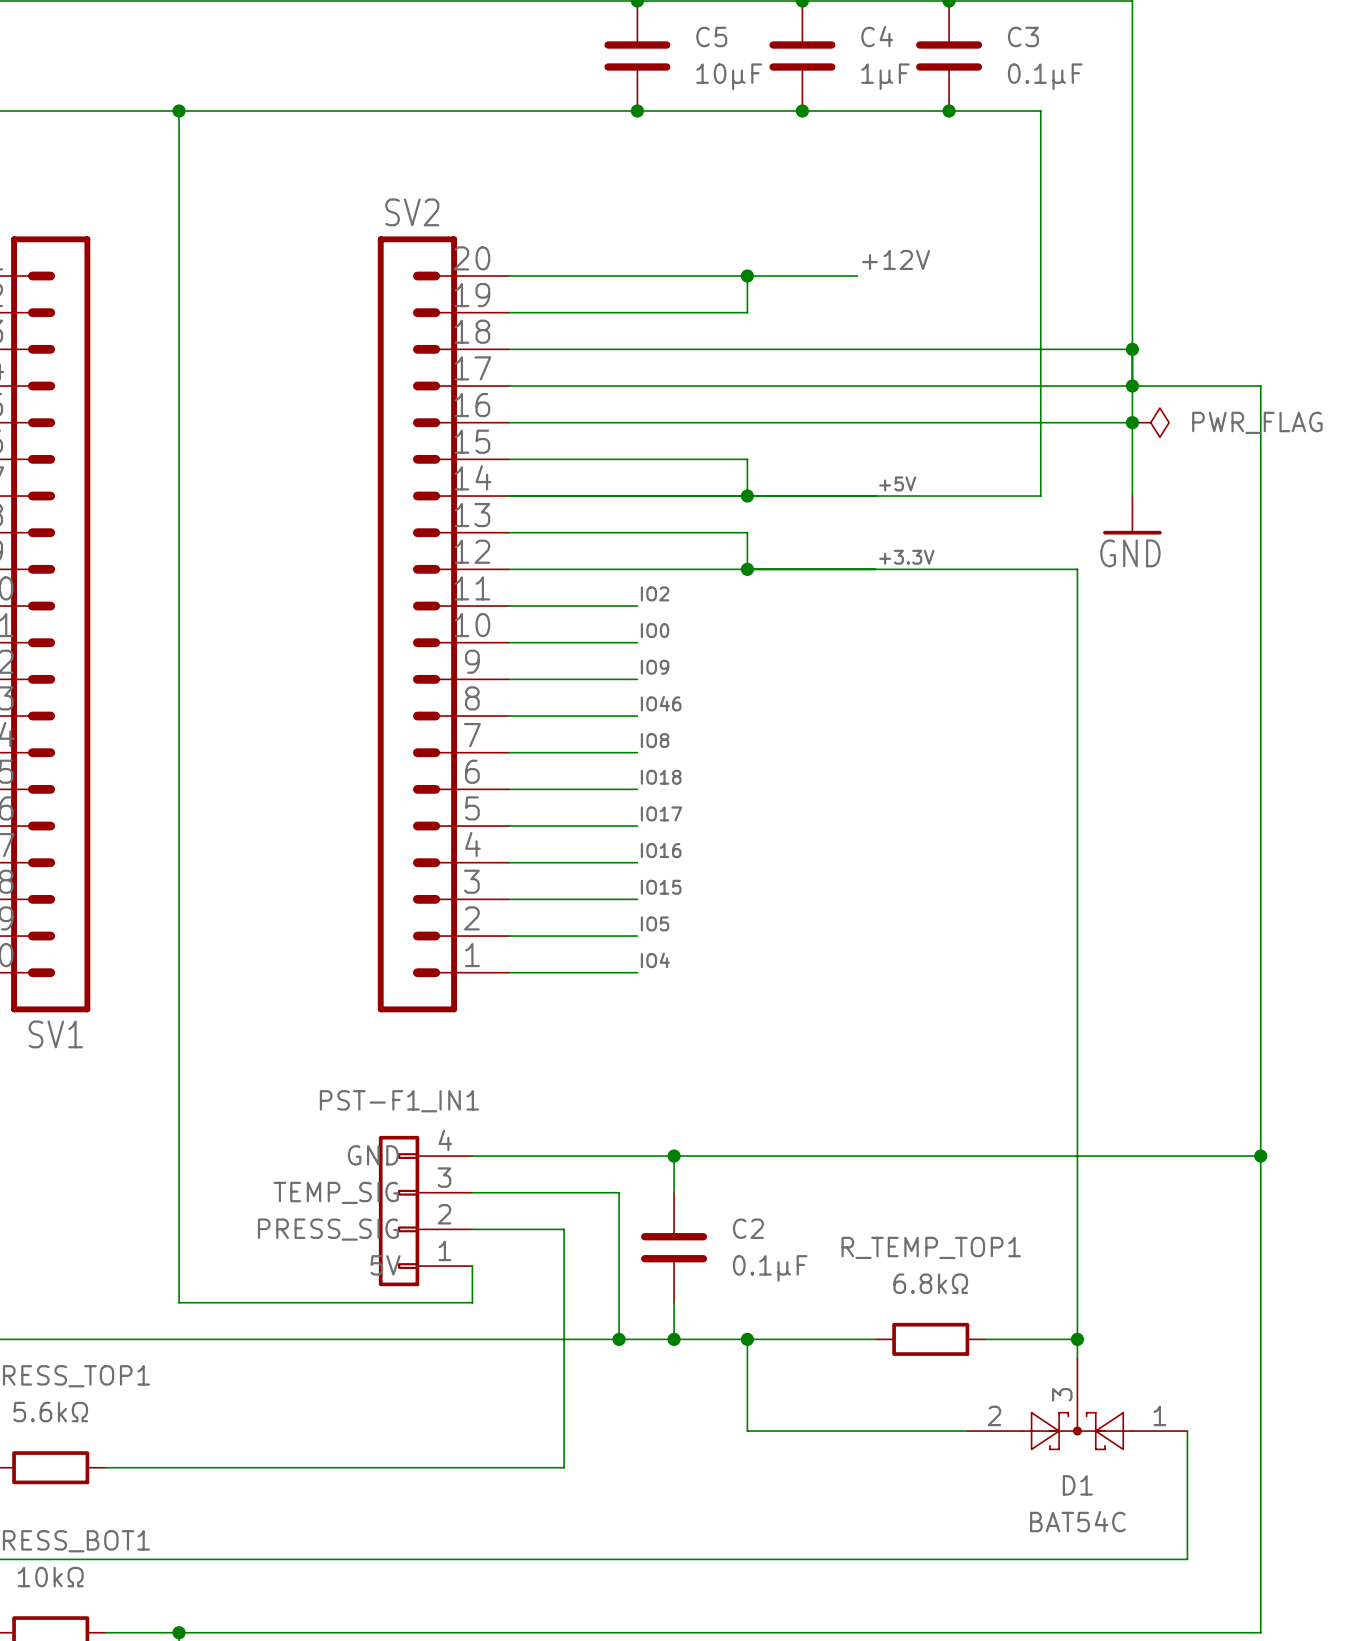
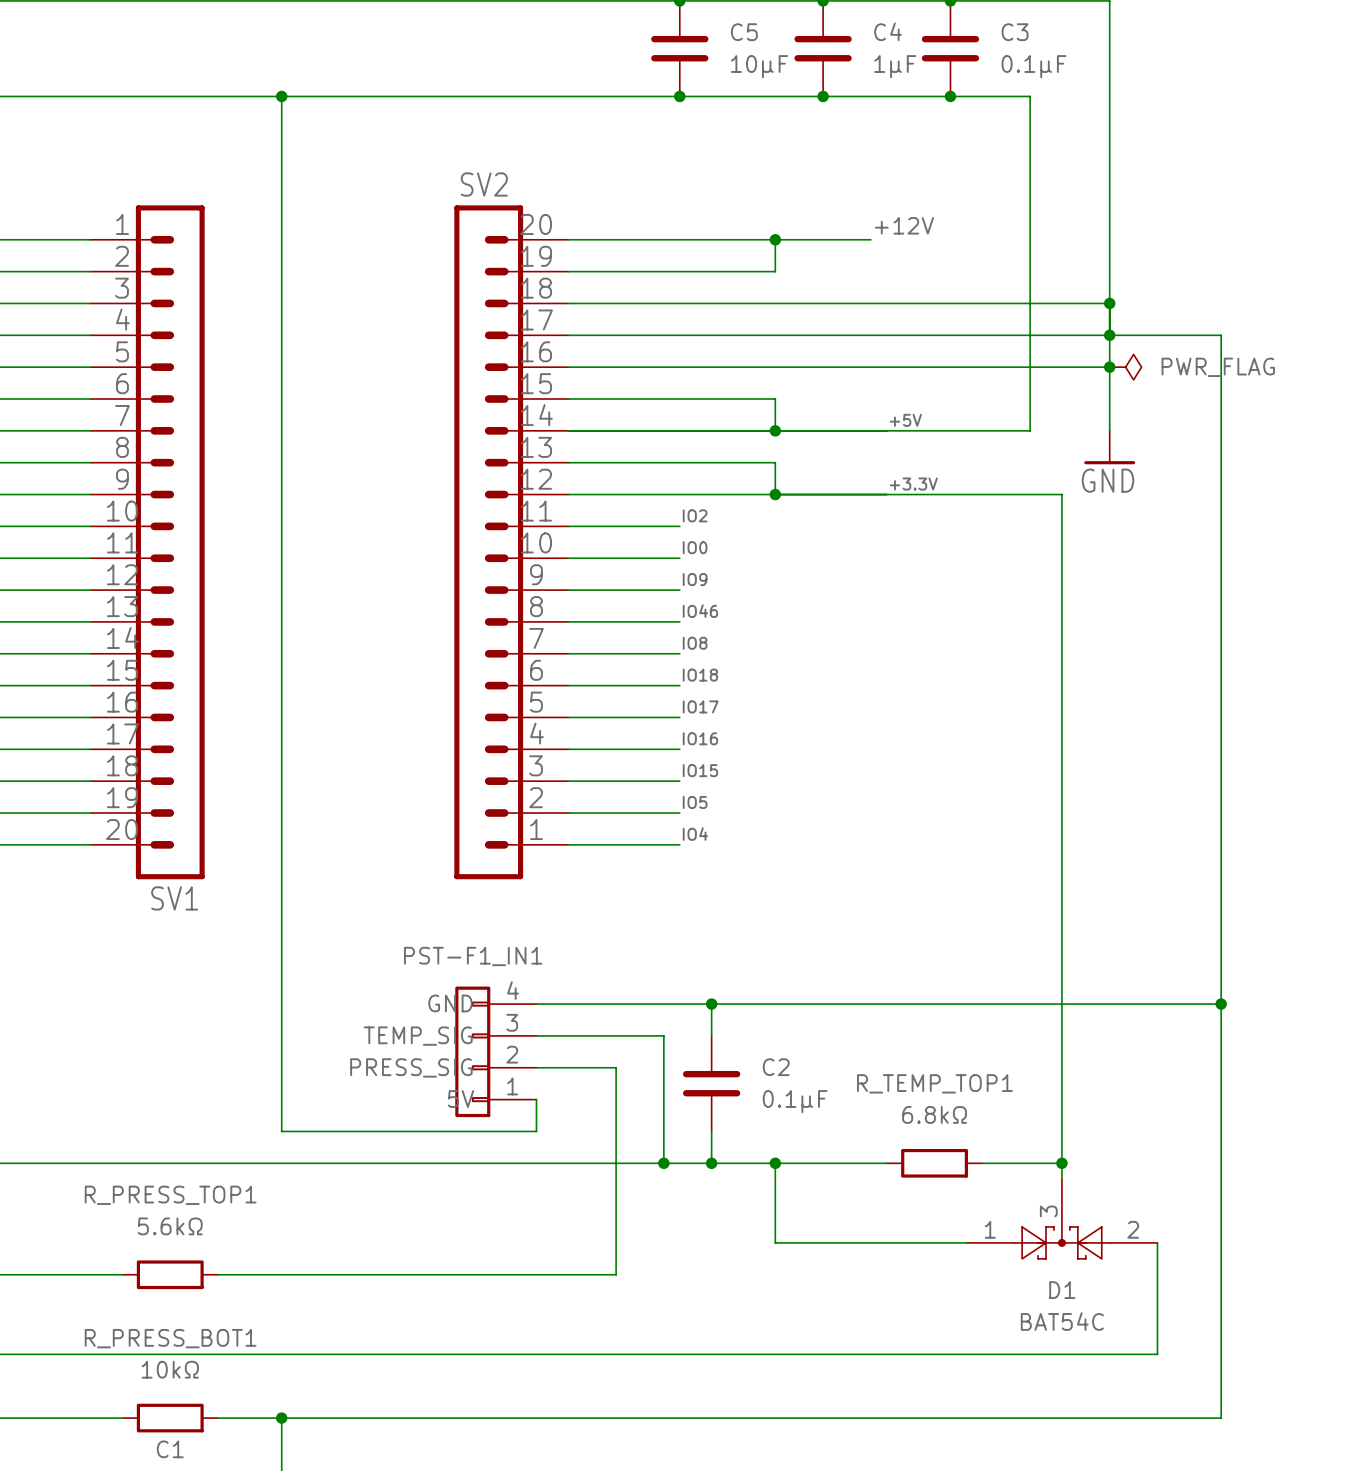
D1 flip: as is (1077, 1431) -> left-right (1061, 1242)

